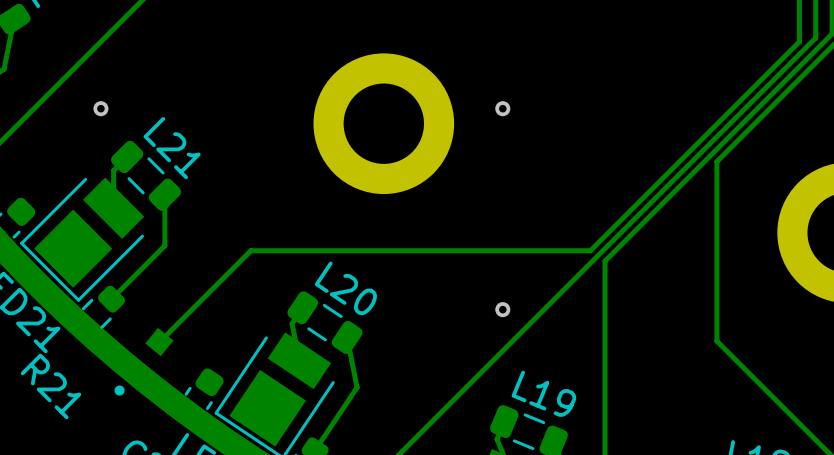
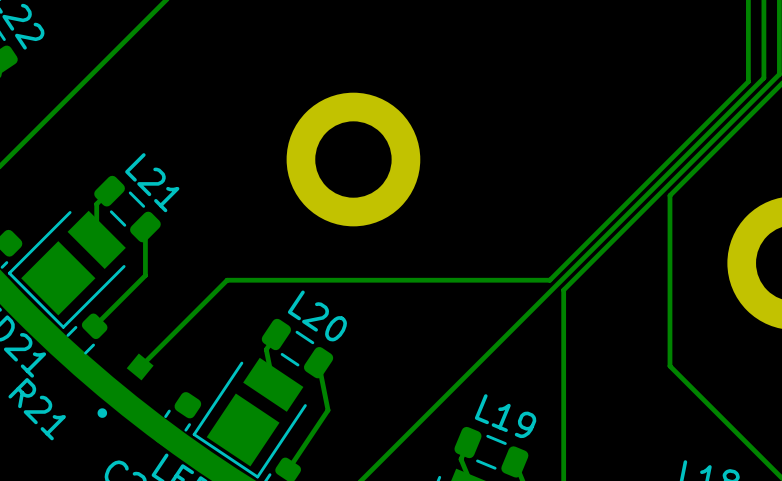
via: (100, 108) -> none
via: (502, 108) -> none
via: (502, 309) -> none

